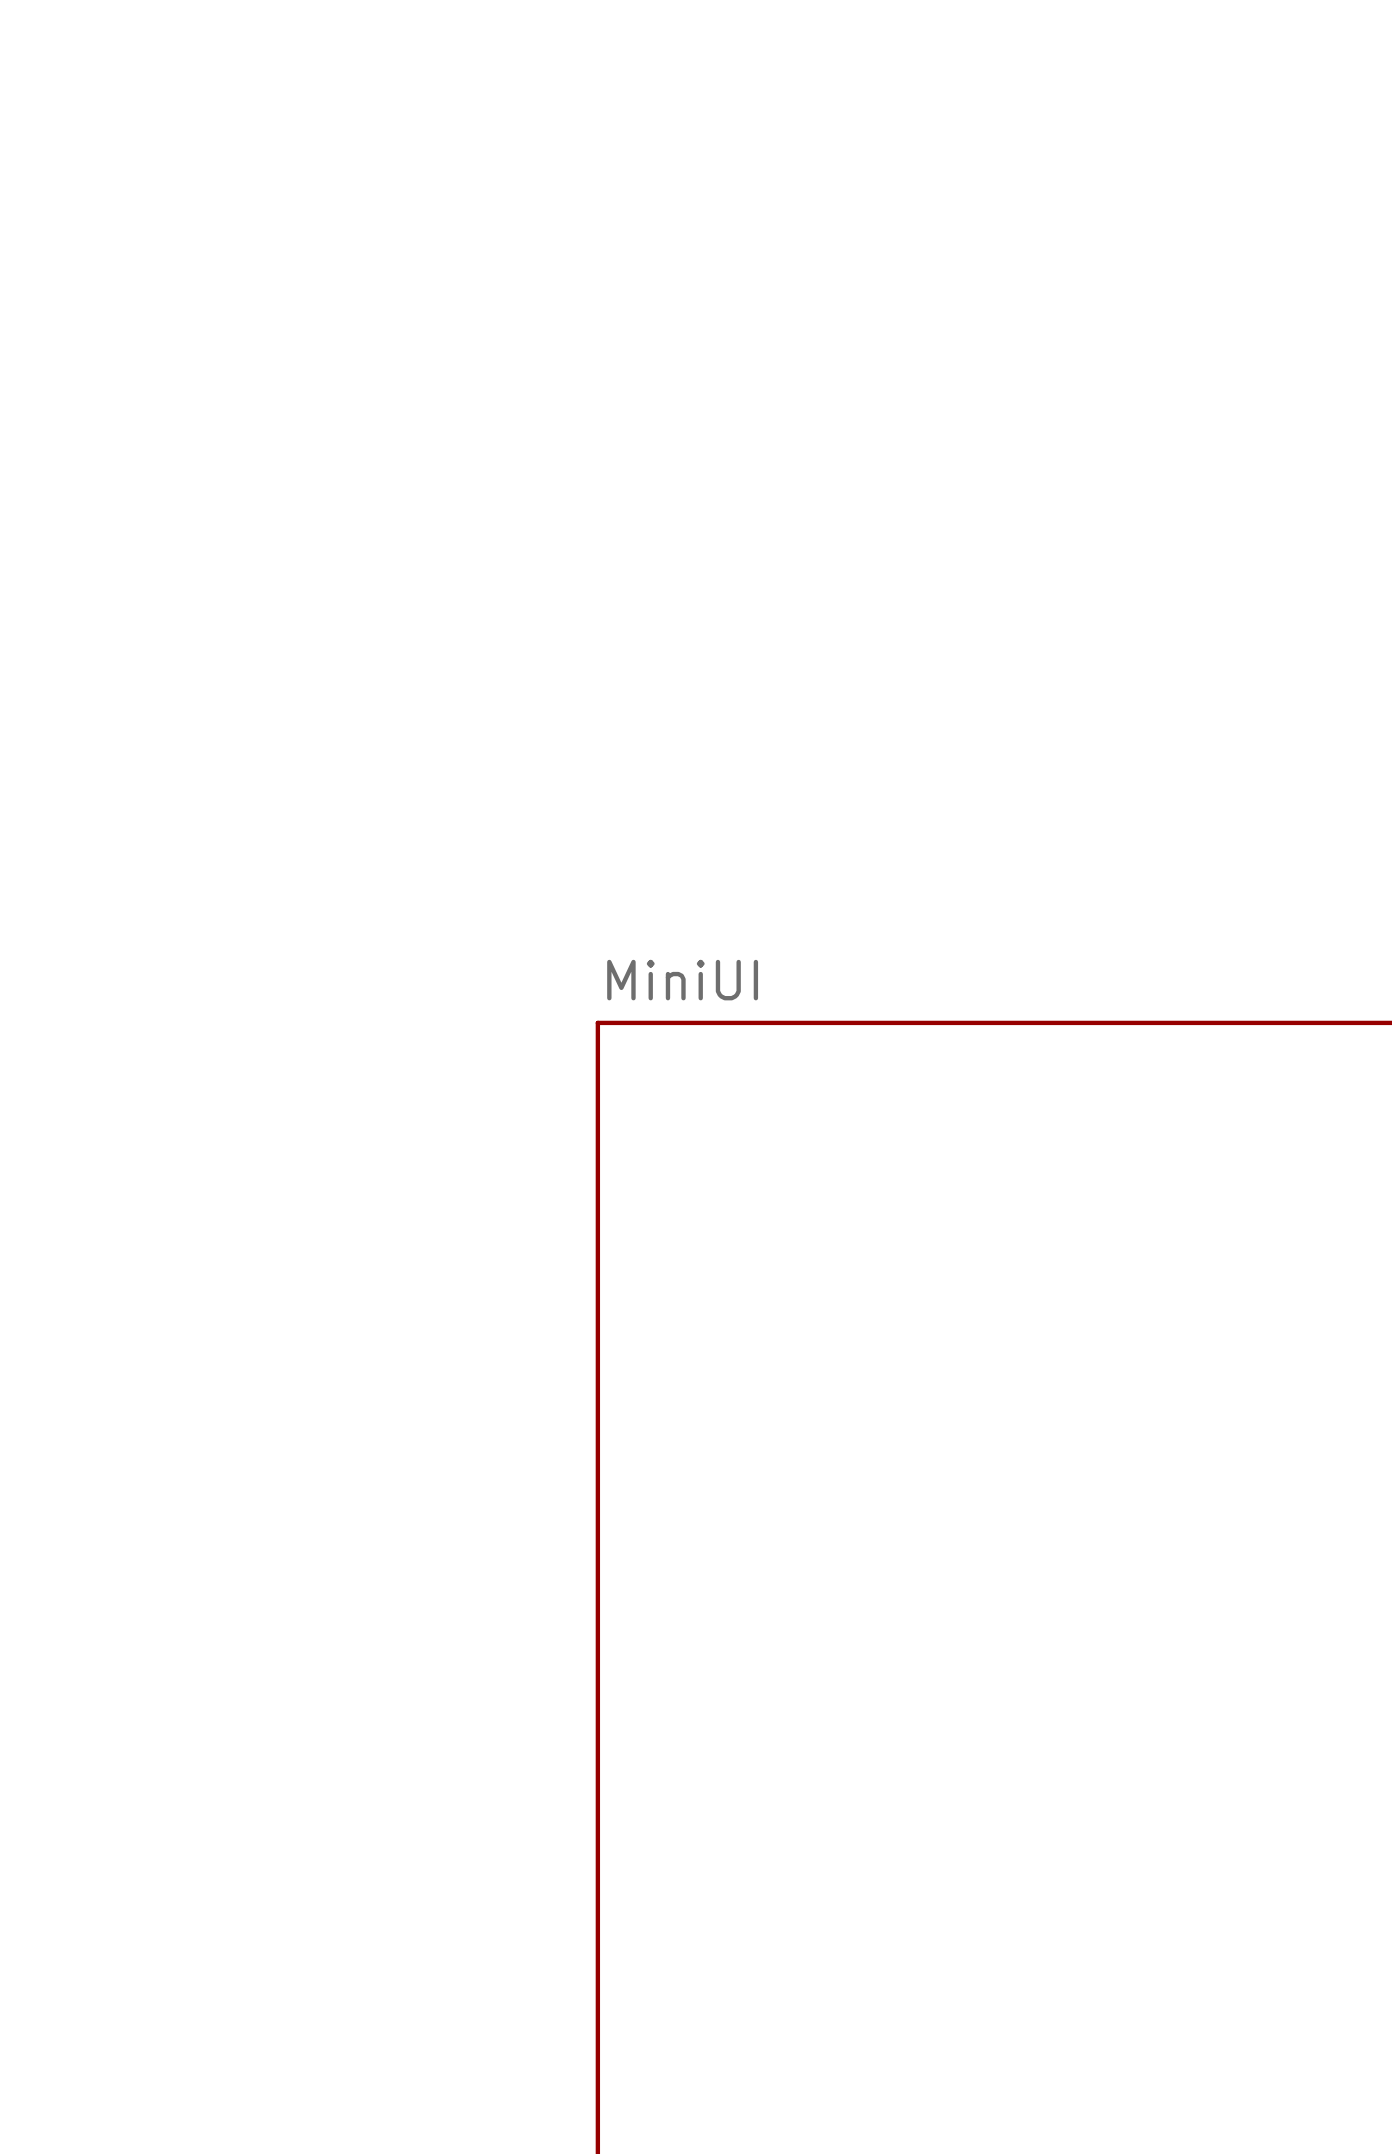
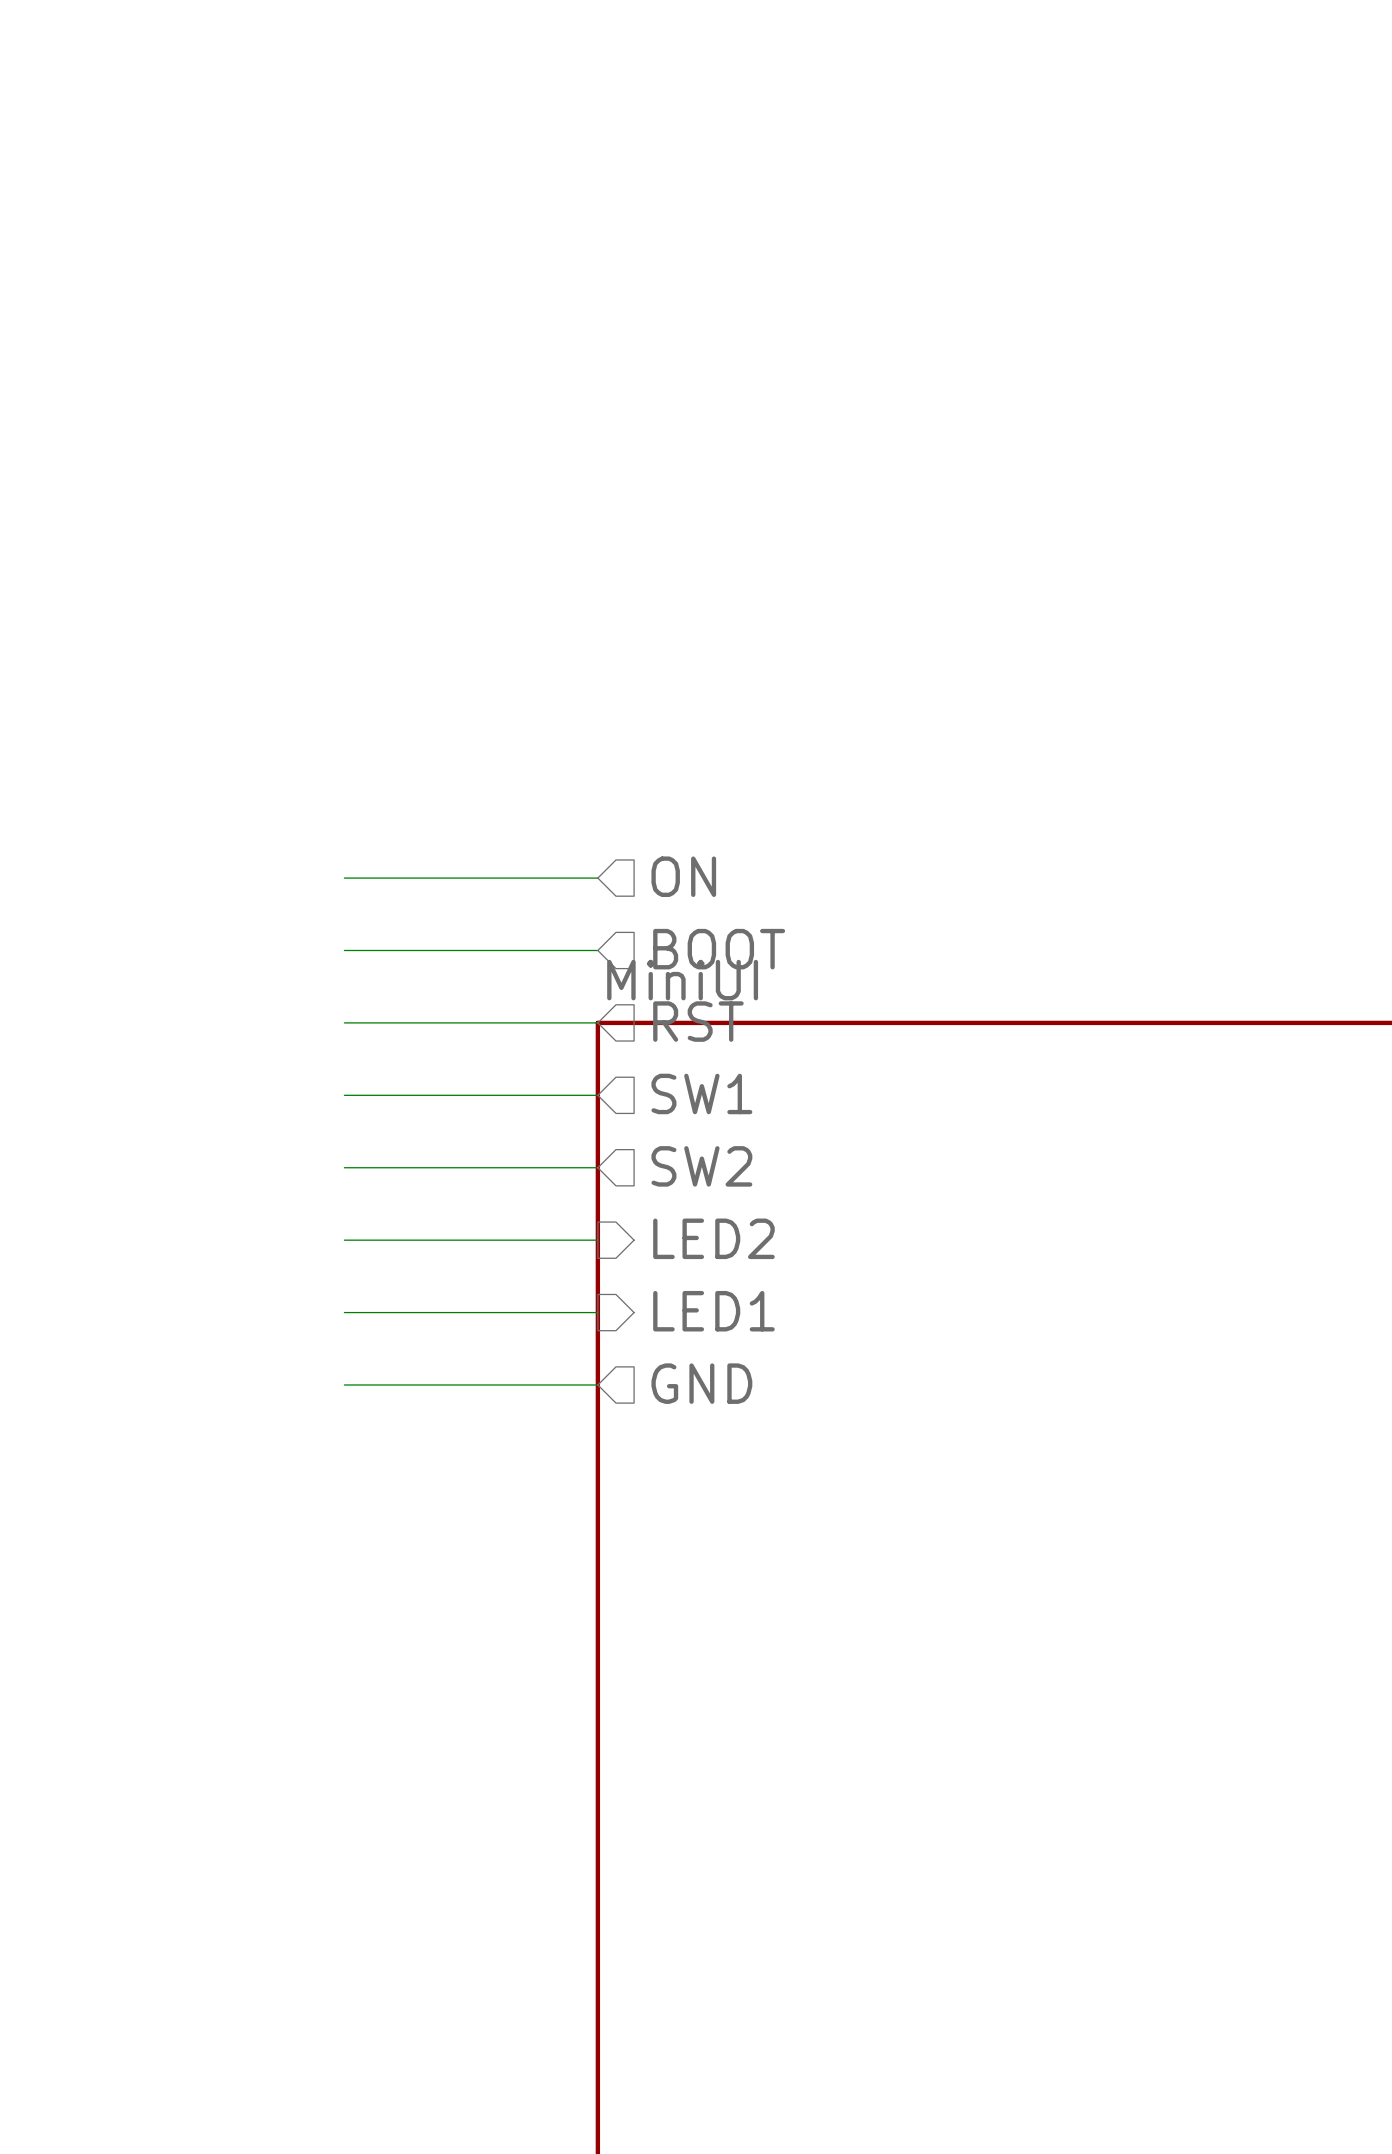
sheet pin: none -> ON (683, 876)
wire: none -> (344, 878) (597, 878)
sheet pin: none -> BOOT (719, 949)
wire: none -> (344, 950) (597, 950)
sheet pin: none -> RST (698, 1021)
wire: none -> (344, 1022) (597, 1022)
sheet pin: none -> SW1 (701, 1093)
wire: none -> (344, 1095) (597, 1095)
sheet pin: none -> SW2 (701, 1166)
wire: none -> (344, 1167) (597, 1167)
sheet pin: none -> LED2 (713, 1238)
wire: none -> (344, 1240) (597, 1240)
sheet pin: none -> LED1 (713, 1311)
wire: none -> (344, 1312) (597, 1312)
sheet pin: none -> GND (701, 1383)
wire: none -> (344, 1384) (597, 1384)

